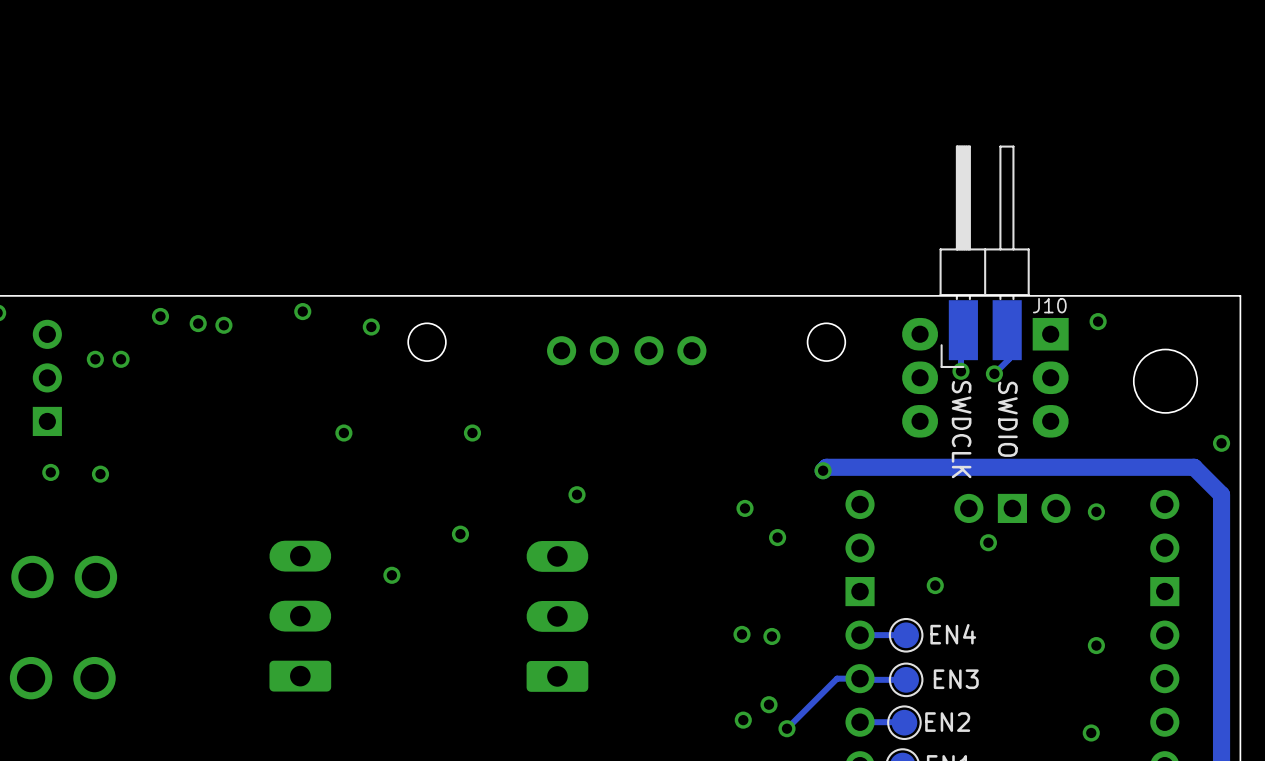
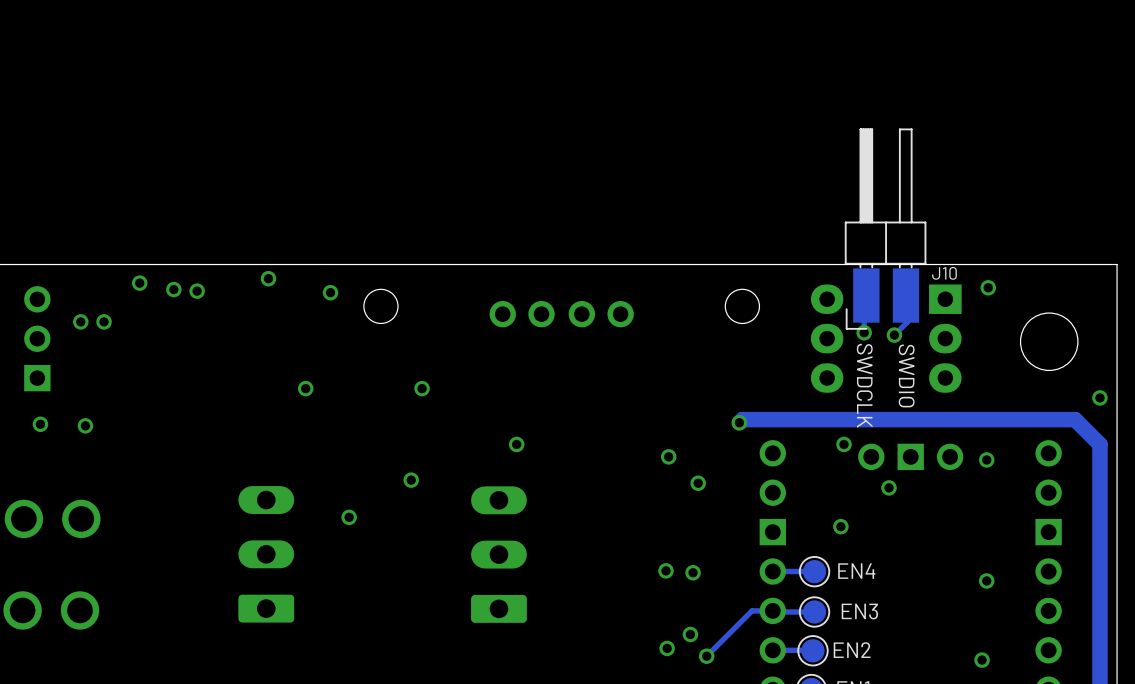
via: none -> (844, 444)

